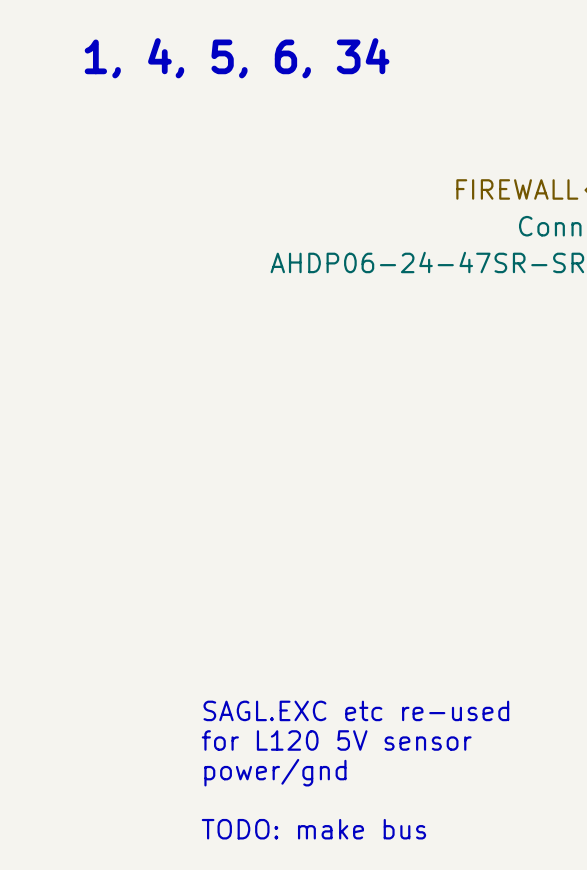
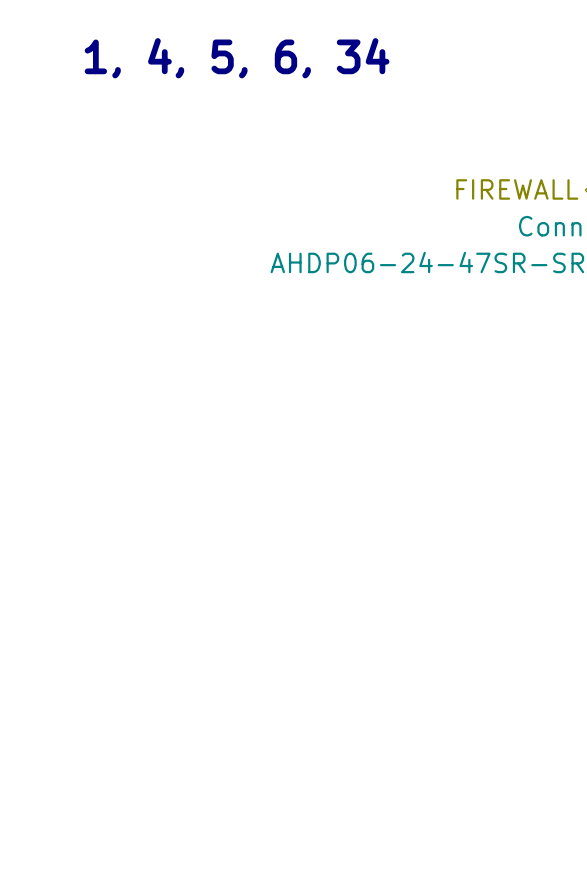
text: SAGL.EXC etc re-used (356, 710) -> none
text: for L120 5V sensor (336, 740) -> none
text: power/gnd (275, 772) -> none
text: TODO: make bus (313, 829) -> none

